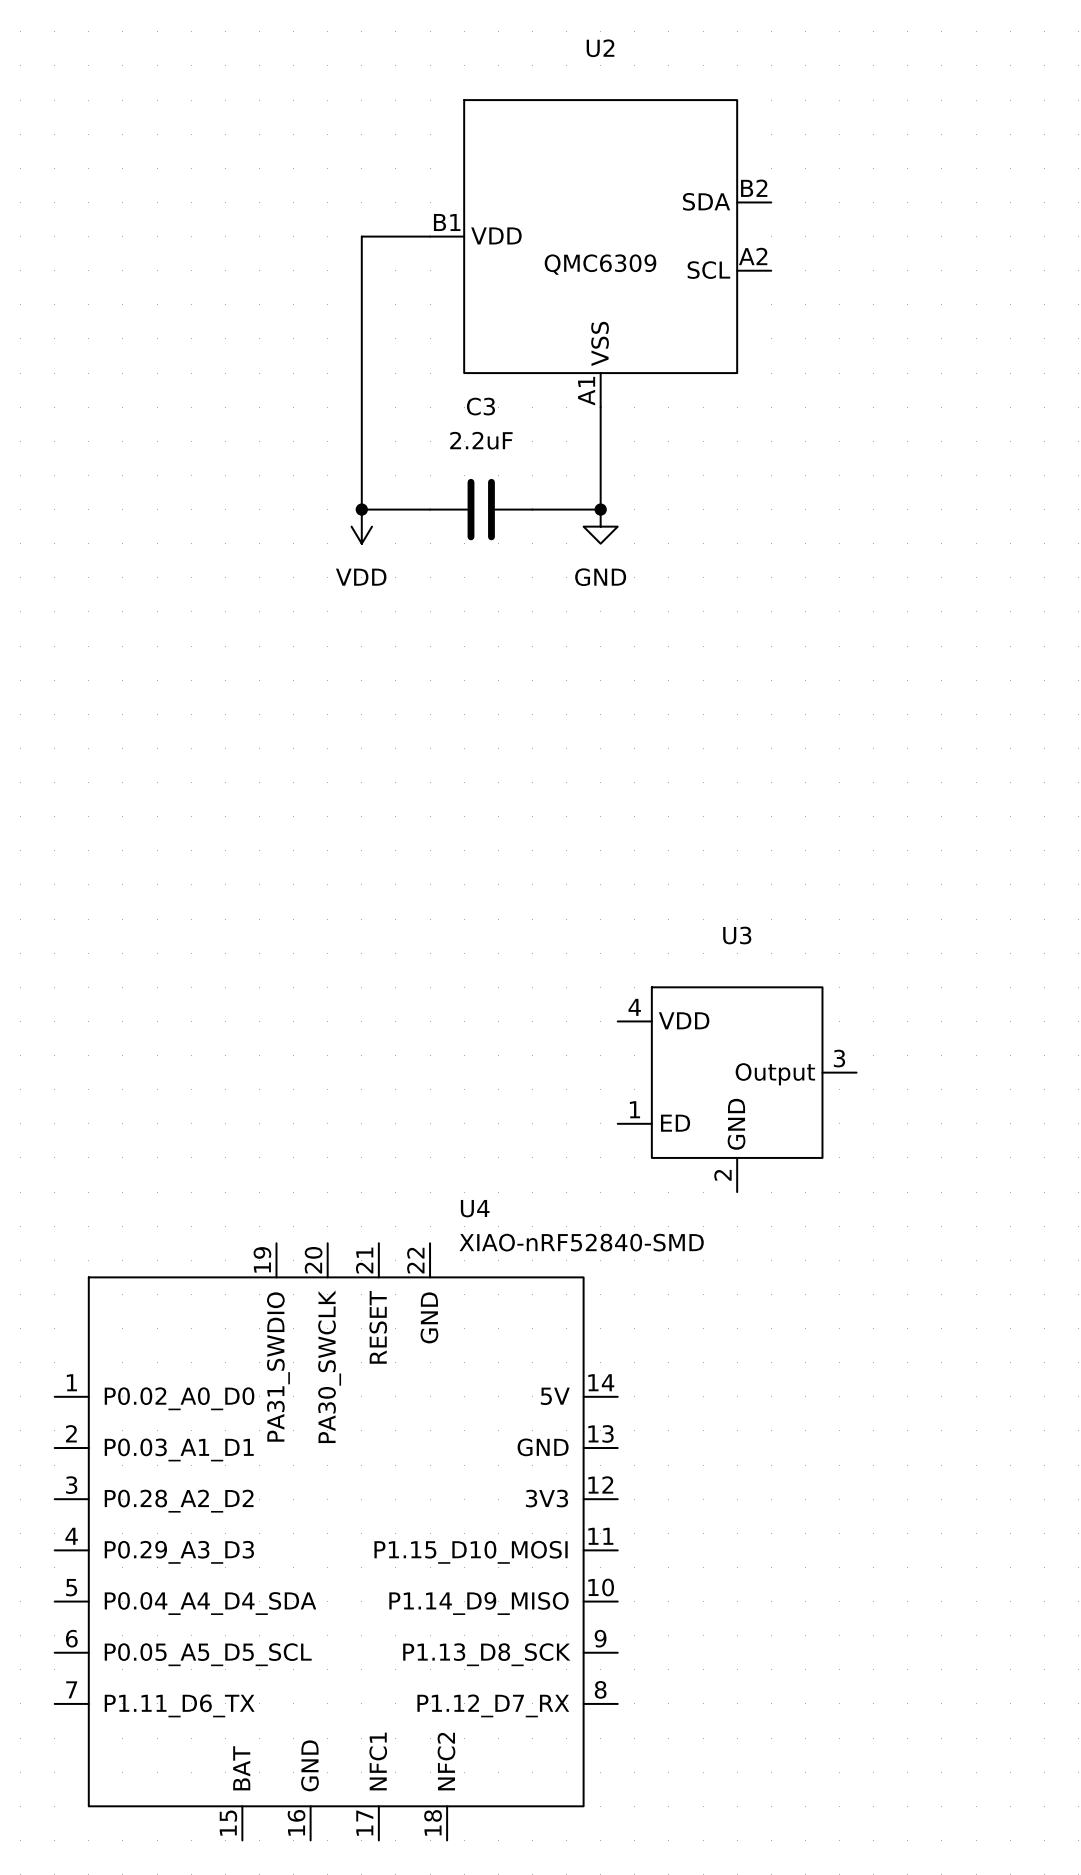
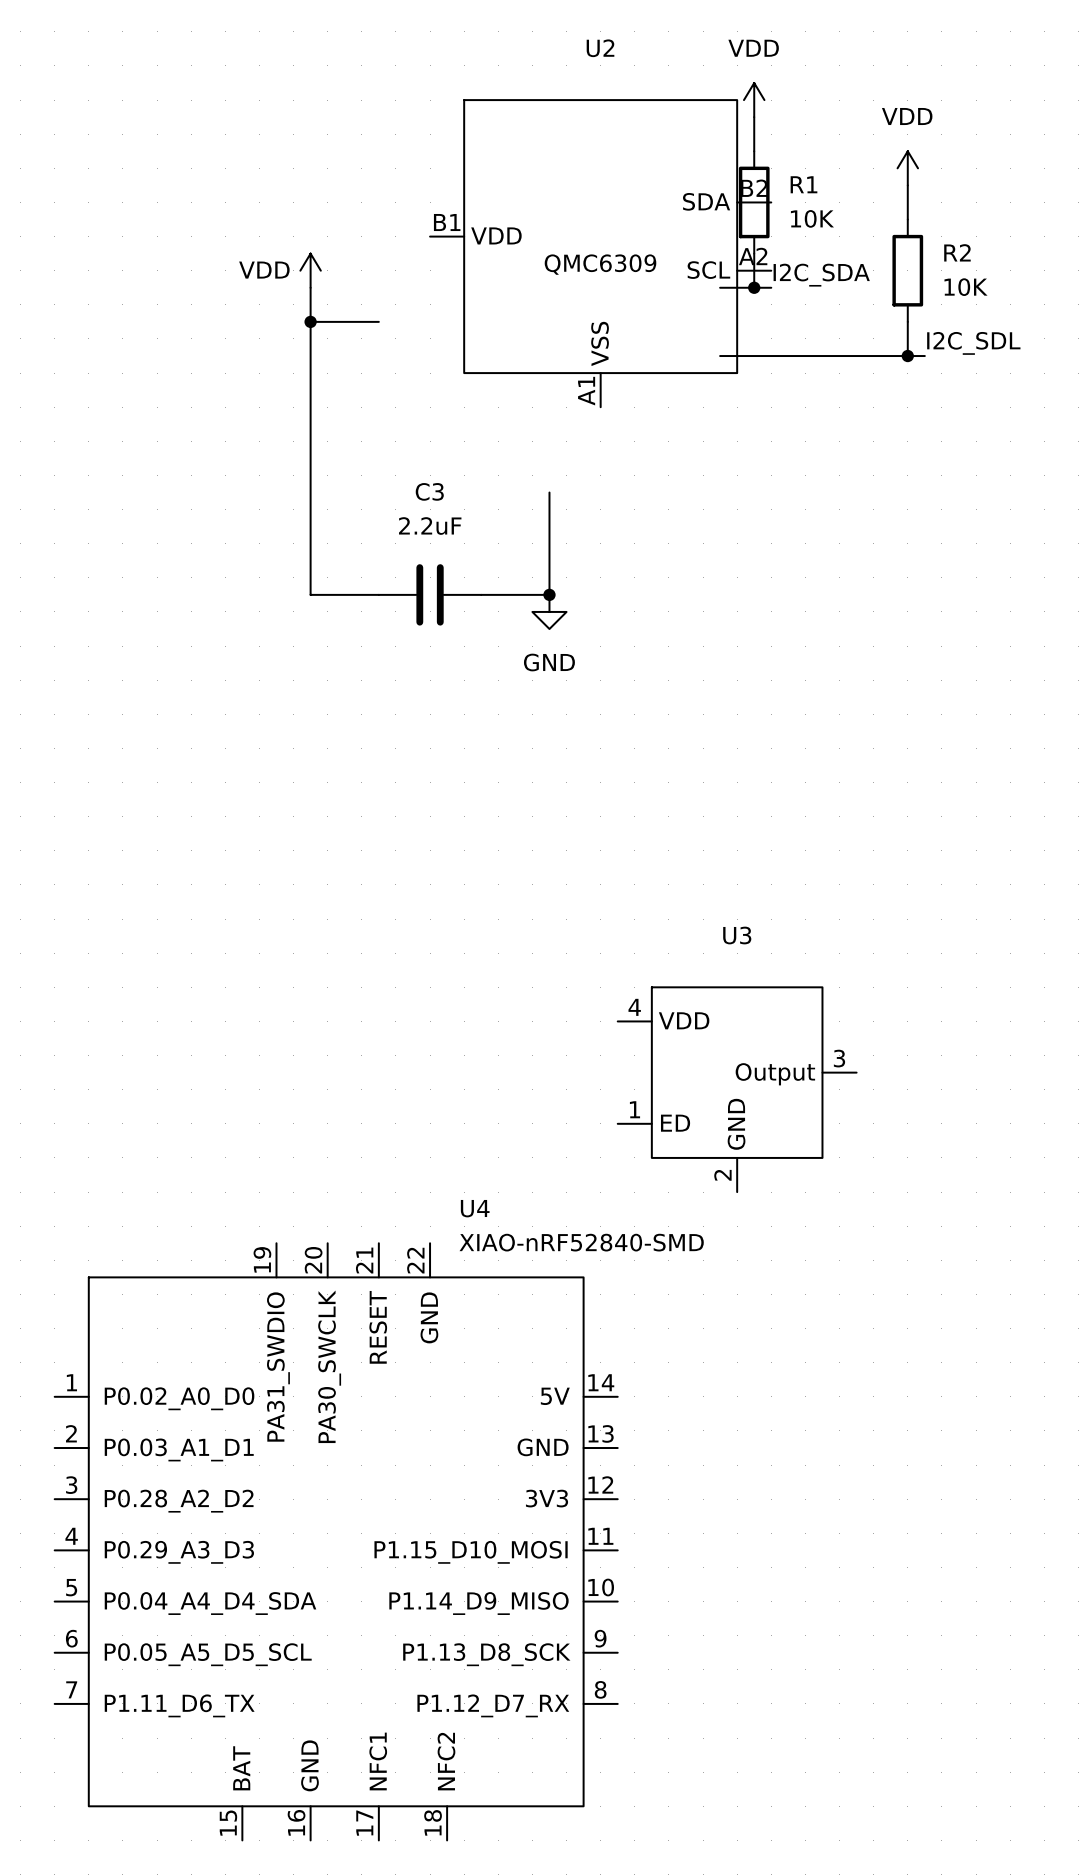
power symbol: none -> VDD (754, 100)
wire: none -> (754, 117) (754, 151)
power symbol: none -> VDD (907, 168)
wire: none -> (907, 185) (907, 219)
R1: none -> 10K (754, 202)
wire: (430, 236) (361, 236) (361, 509) (430, 509) -> none
wire: none -> (754, 253) (754, 287)
R2: none -> 10K (907, 270)
label: none -> I2C_SDA (821, 275)
wire: none -> (310, 287) (310, 594) (378, 594)
wire: none -> (720, 287) (771, 287)
junction: none -> (754, 287)
wire: none -> (310, 321) (378, 321)
junction: none -> (310, 321)
wire: none -> (907, 321) (907, 356)
label: none -> I2C_SDL (973, 343)
wire: none -> (720, 356) (924, 356)
junction: none -> (907, 356)
wire: (600, 407) (600, 509) (532, 509) -> (549, 492) (549, 594) (481, 594)
junction: (361, 509) -> none
C3 position: (481, 509) -> (430, 594)
junction: (600, 509) -> none
power symbol rotation: 0° (361, 526) -> 180° (310, 270)
power symbol position: VDD (361, 526) -> VDD (310, 270)
power symbol position: GND (600, 526) -> GND (549, 611)
power symbol text position: VDD (361, 577) -> VDD (264, 270)
junction: none -> (549, 594)

